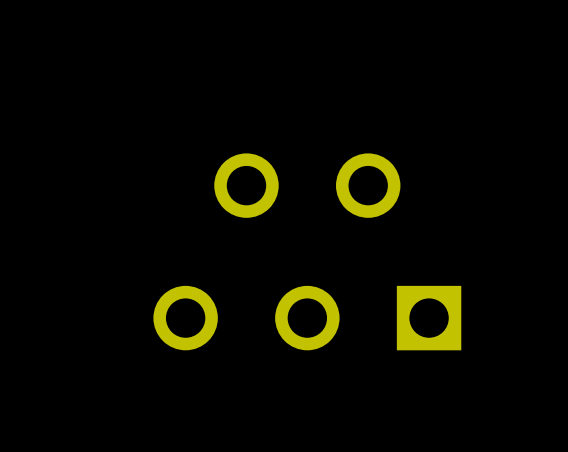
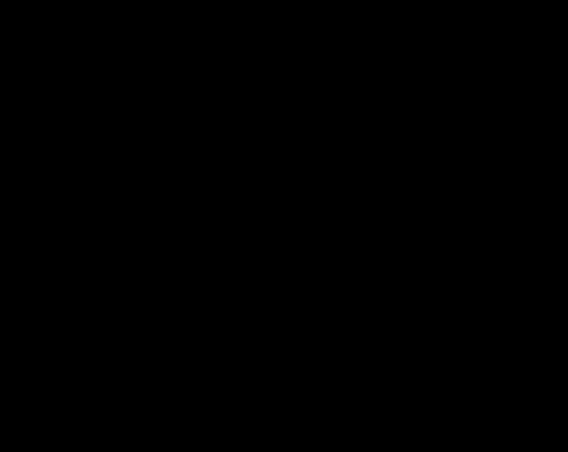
part: (307, 251) -> none

